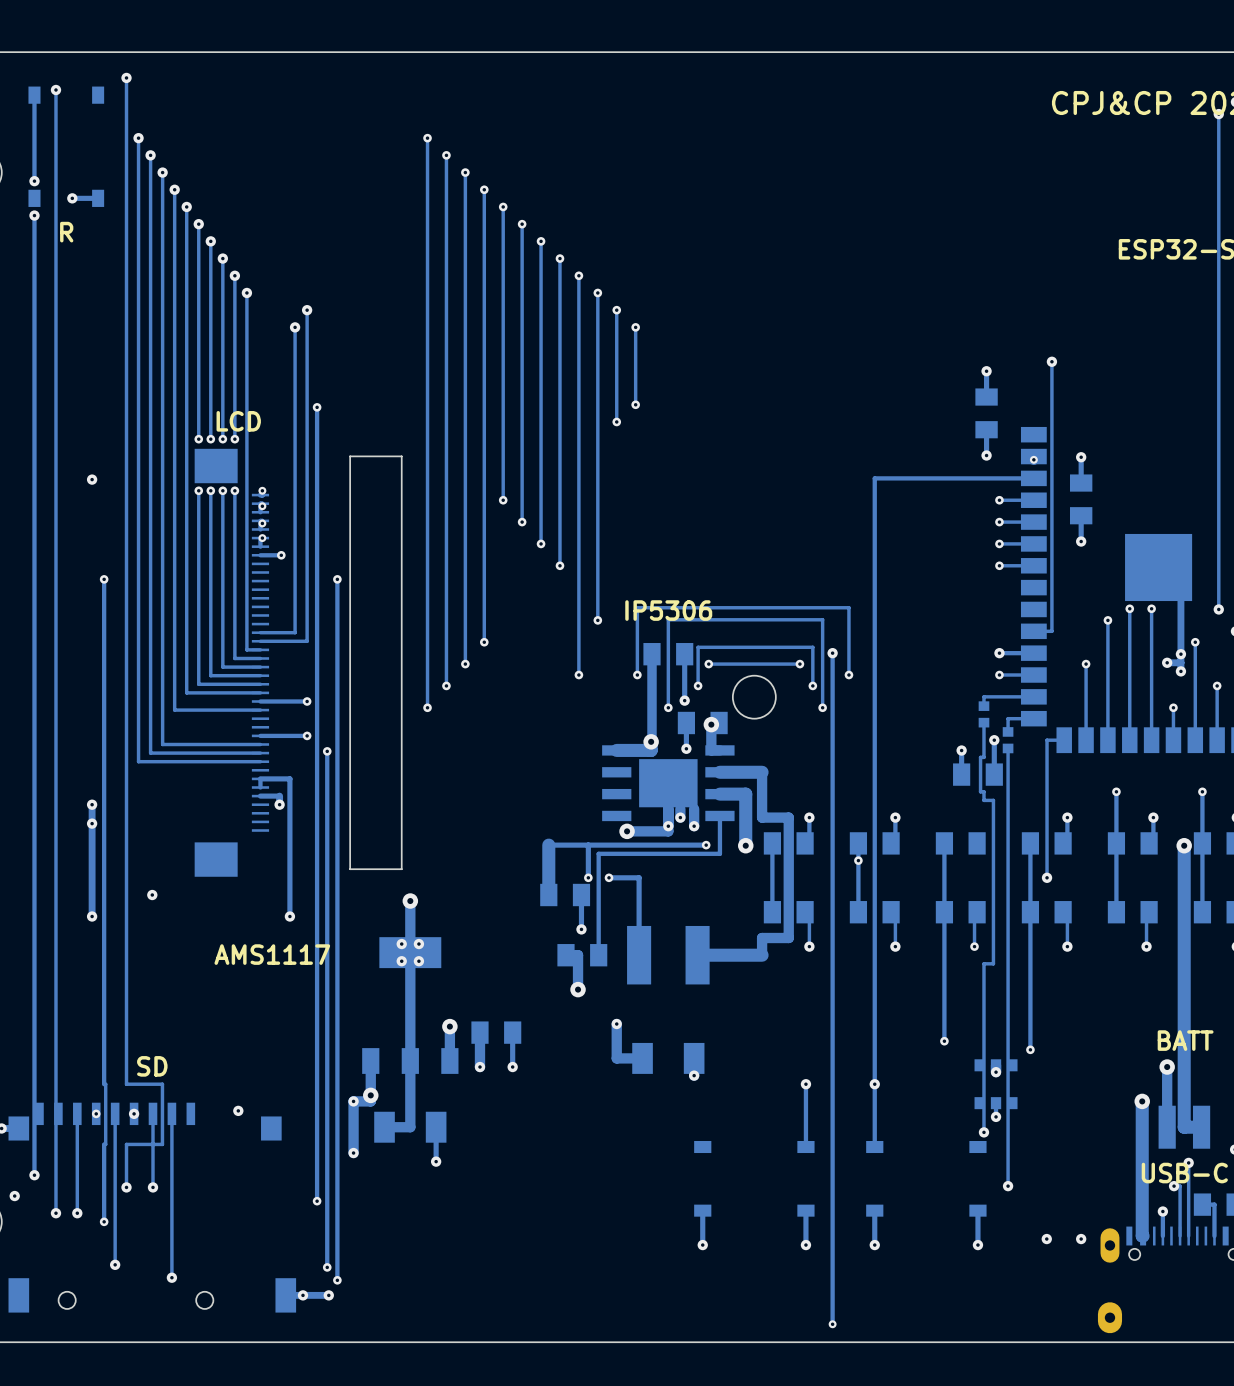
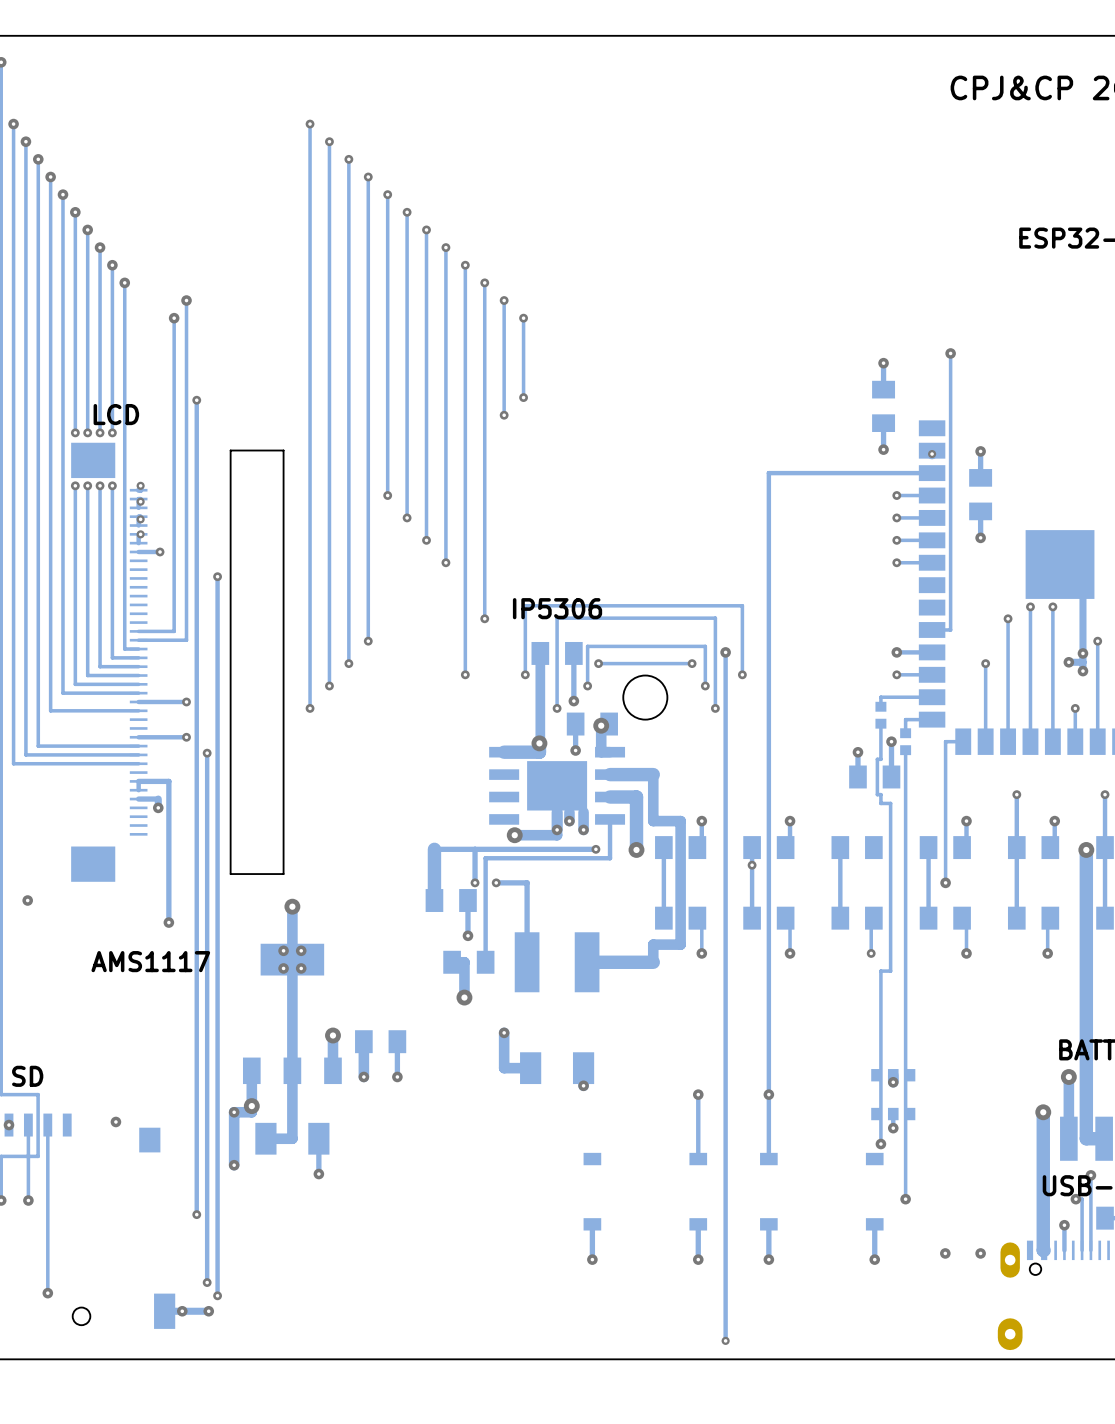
track: (944, 912) (944, 1041) -> none
track: (1030, 912) (1030, 1049) -> none
via: (944, 1041) -> none
via: (1030, 1049) -> none

